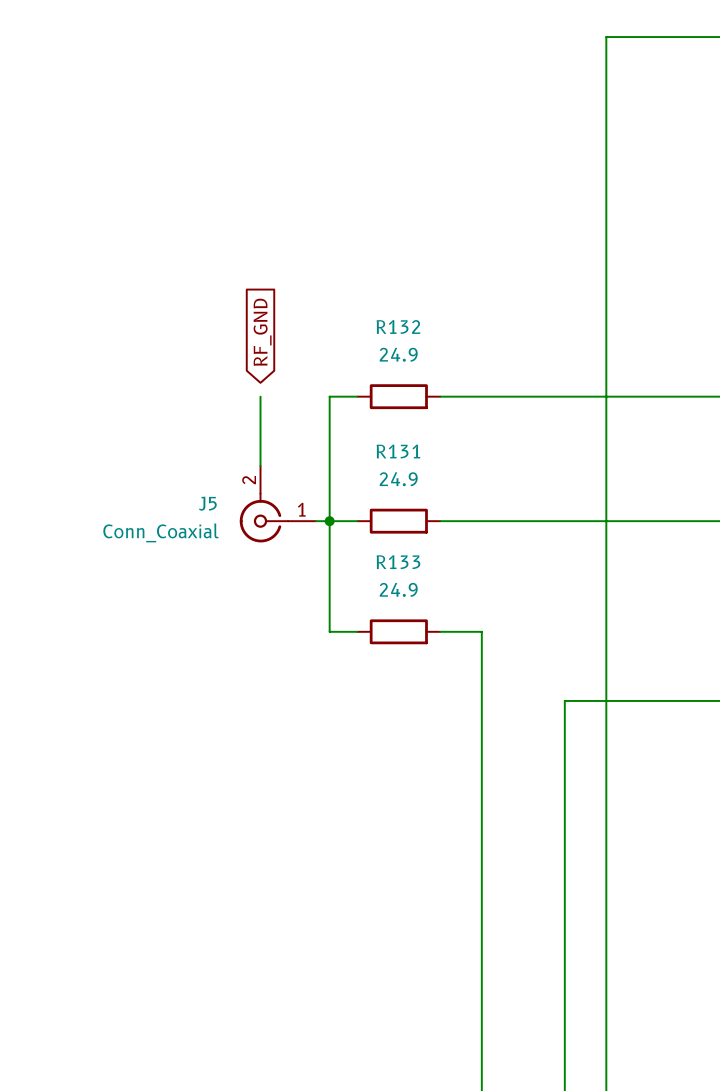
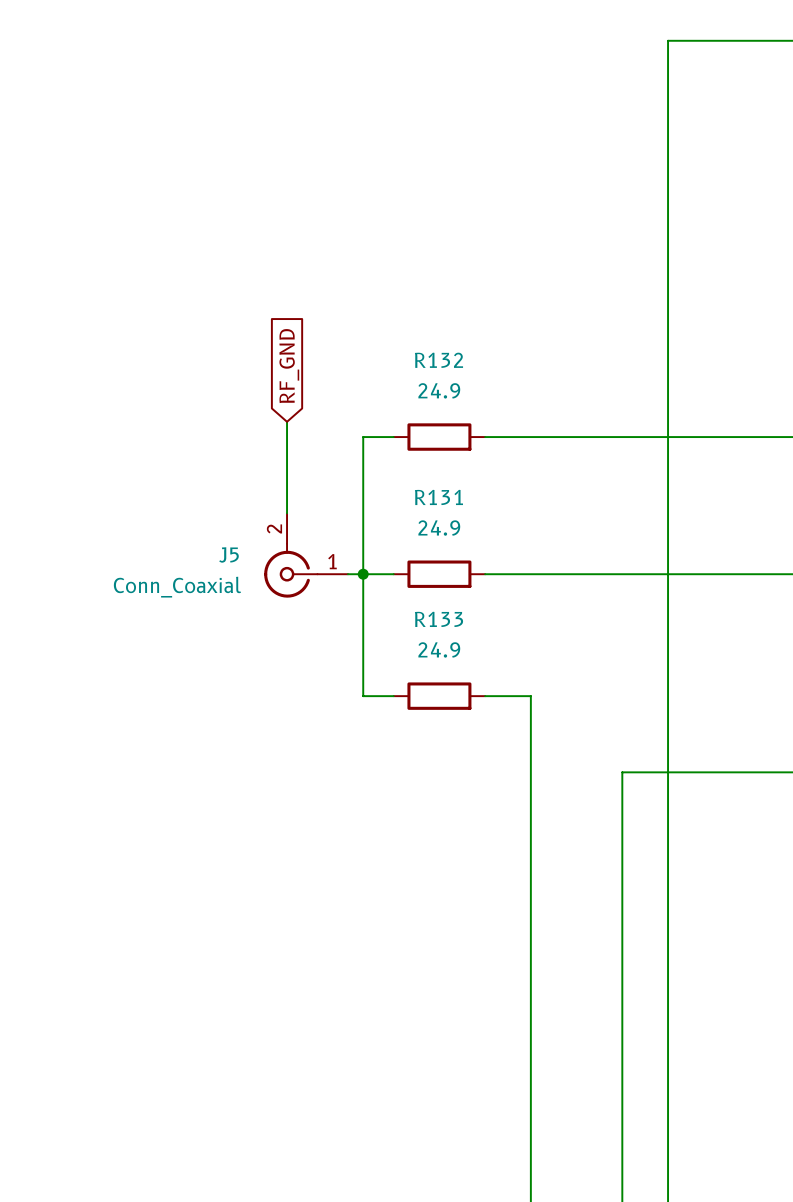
wire: none -> (287, 421) (287, 437)

